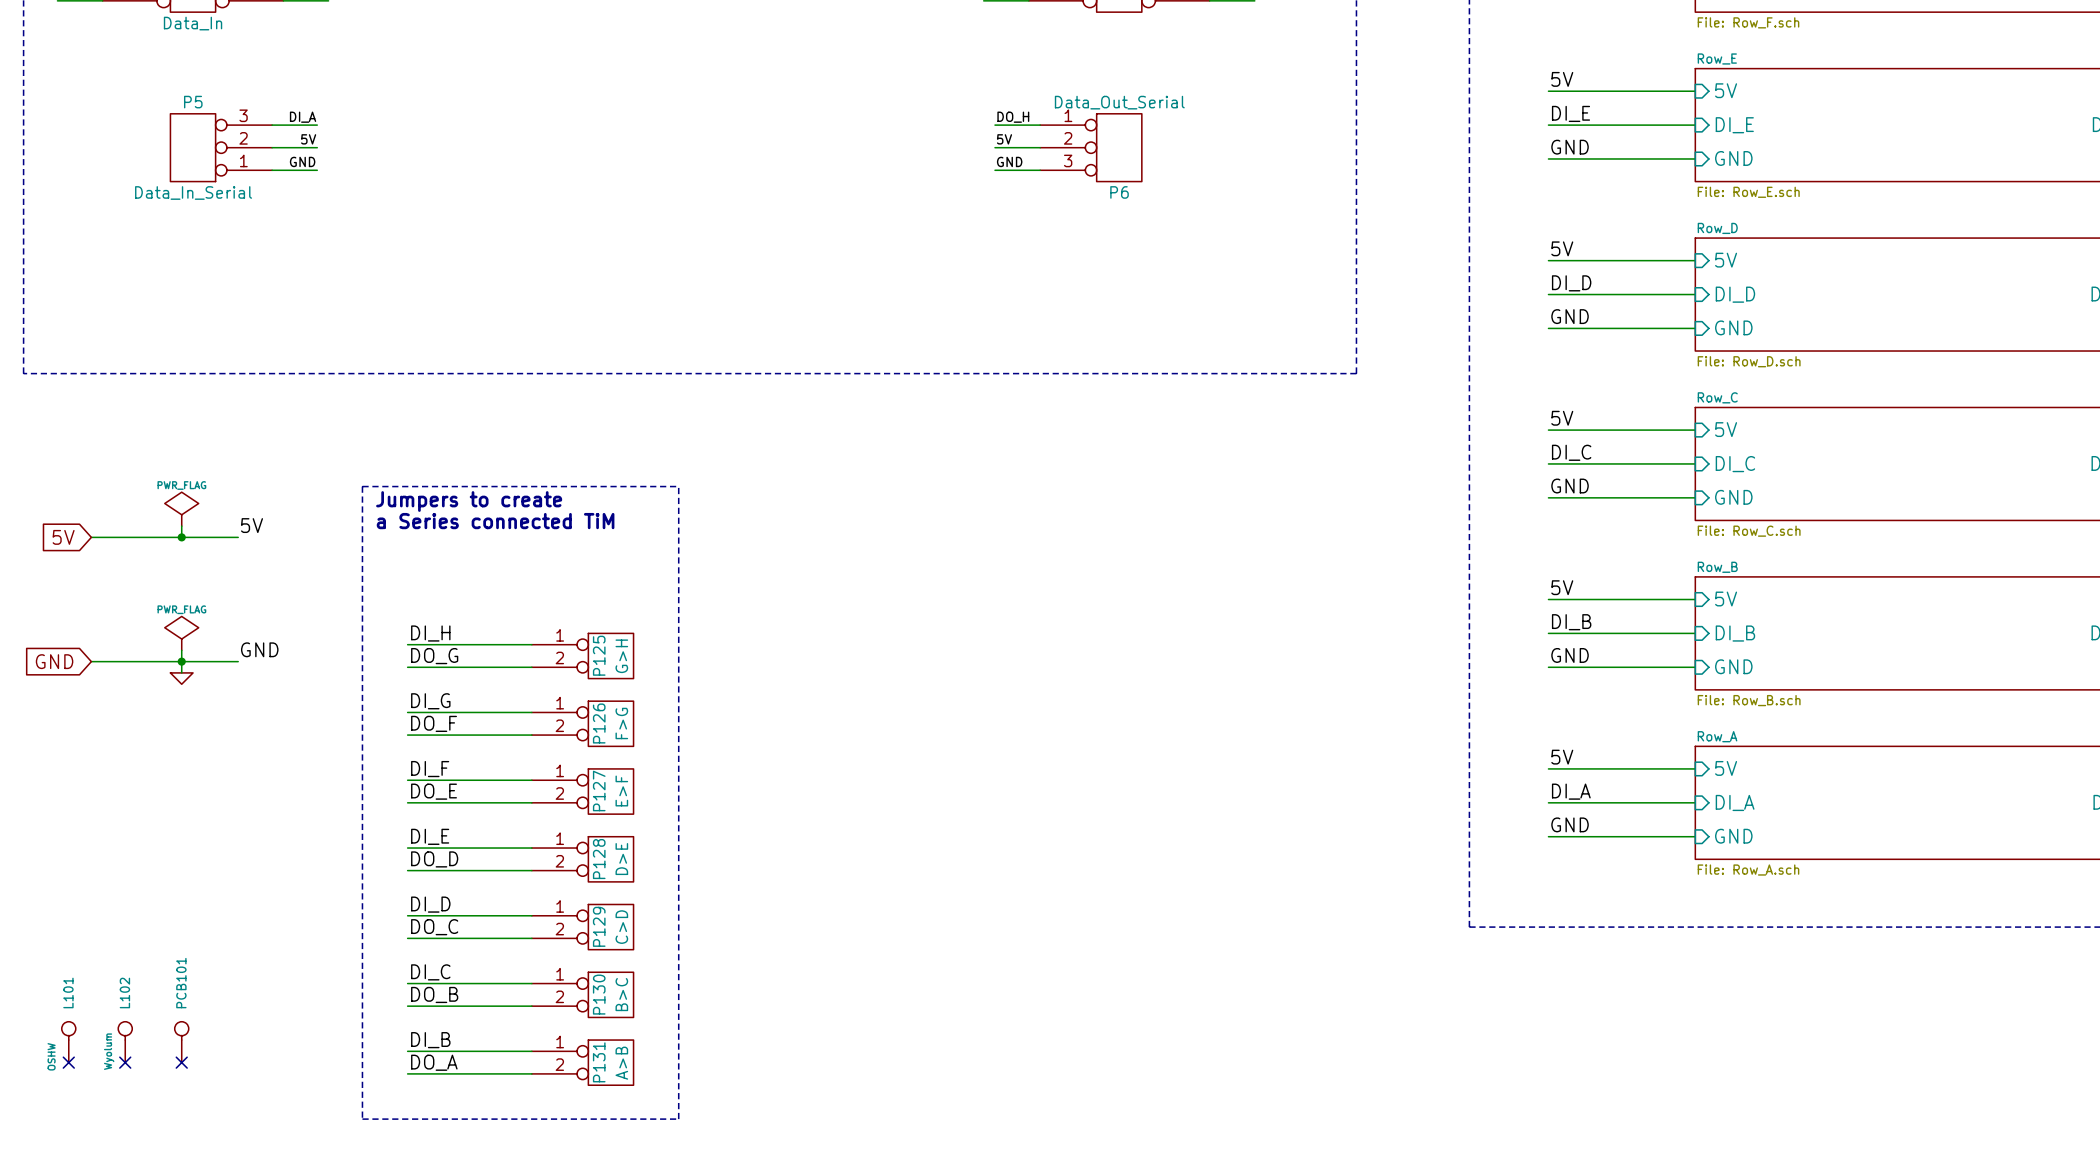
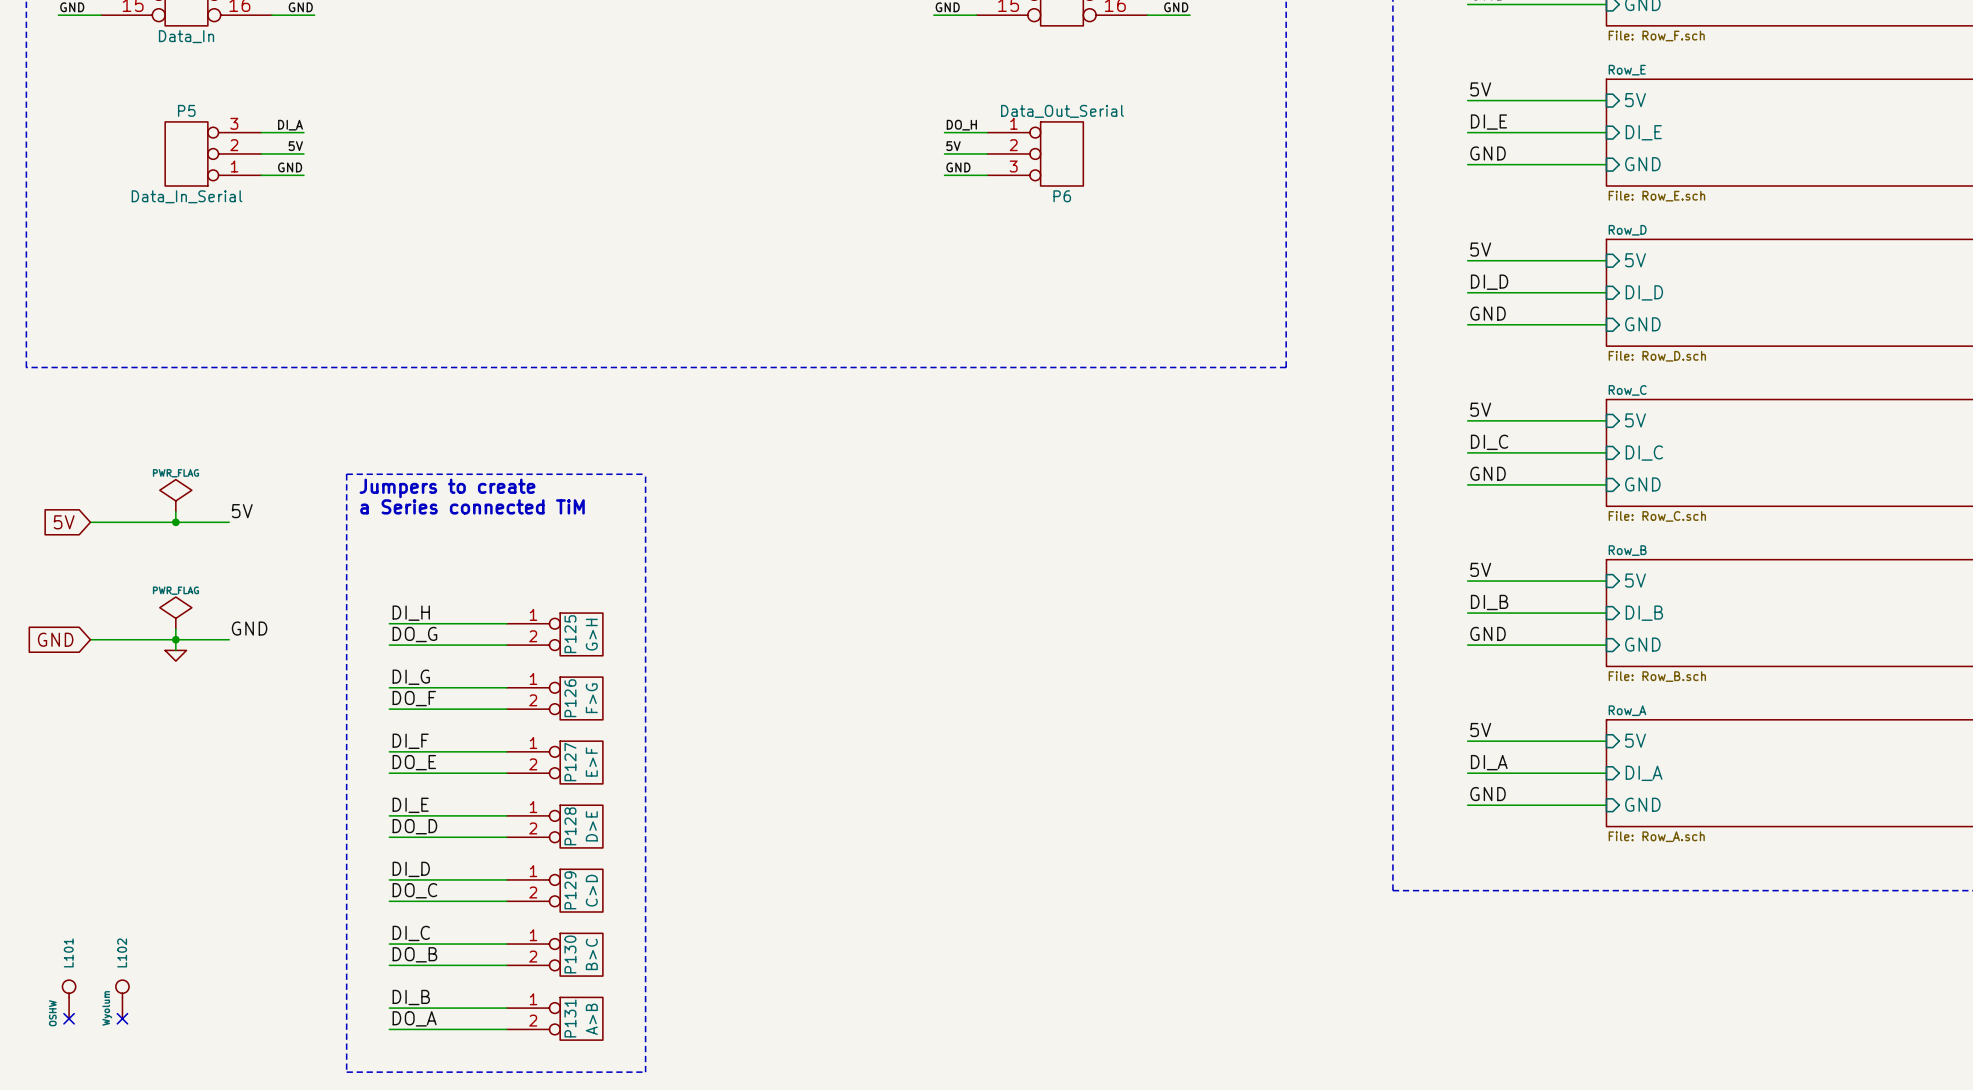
PCB101: (181, 1042) -> none
no-connect mark: (181, 1062) -> none

